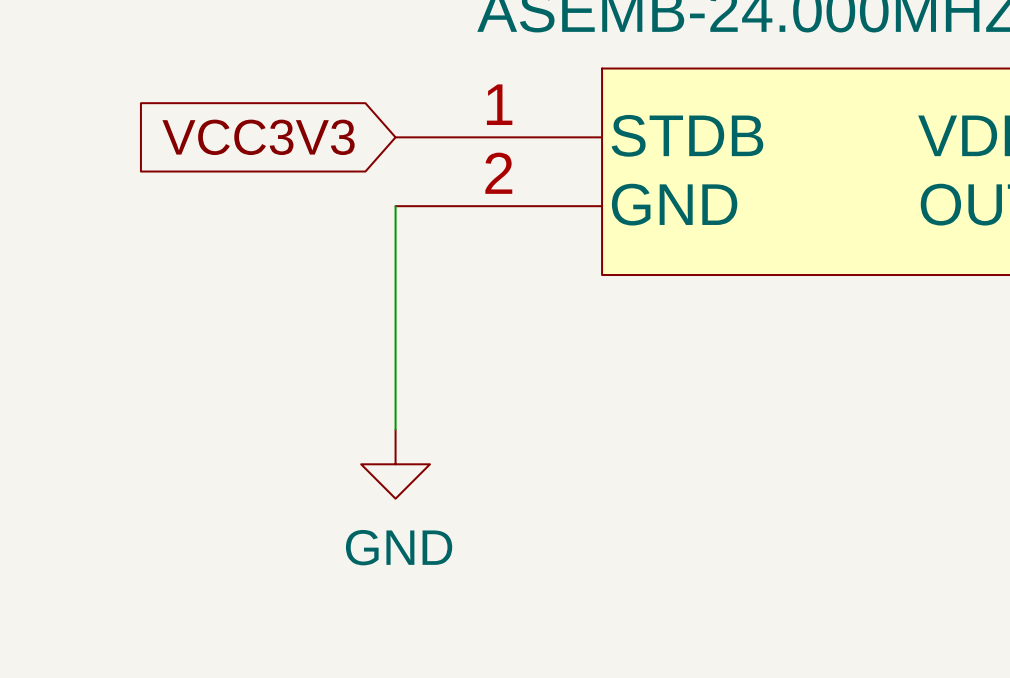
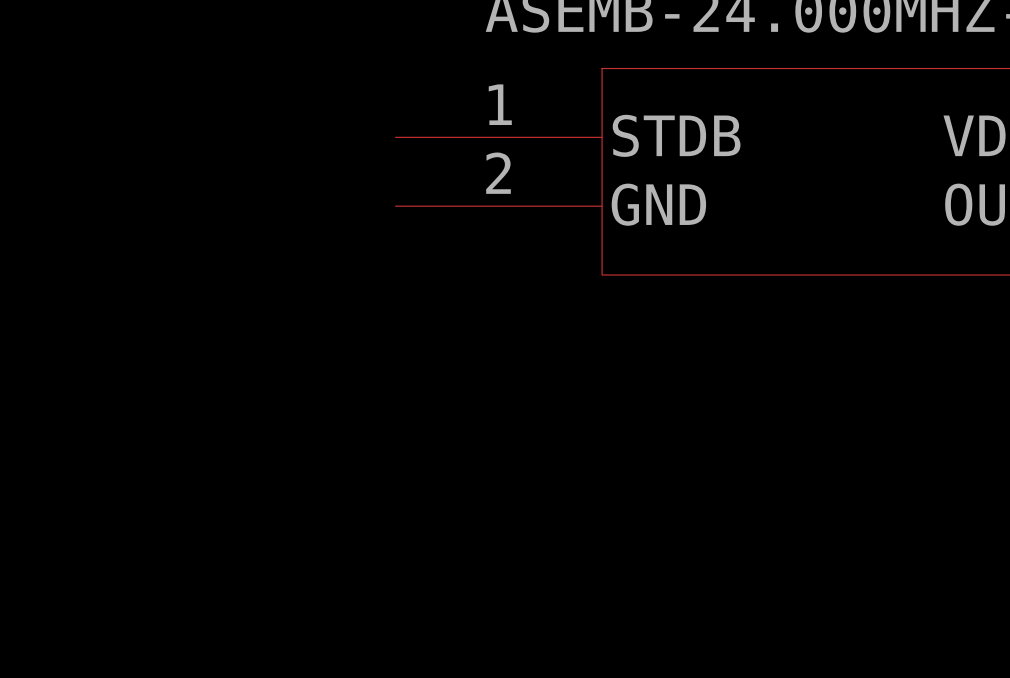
global label: VCC3V3 (258, 137) -> none
wire: (395, 206) (395, 429) -> none
power symbol: GND (395, 464) -> none

